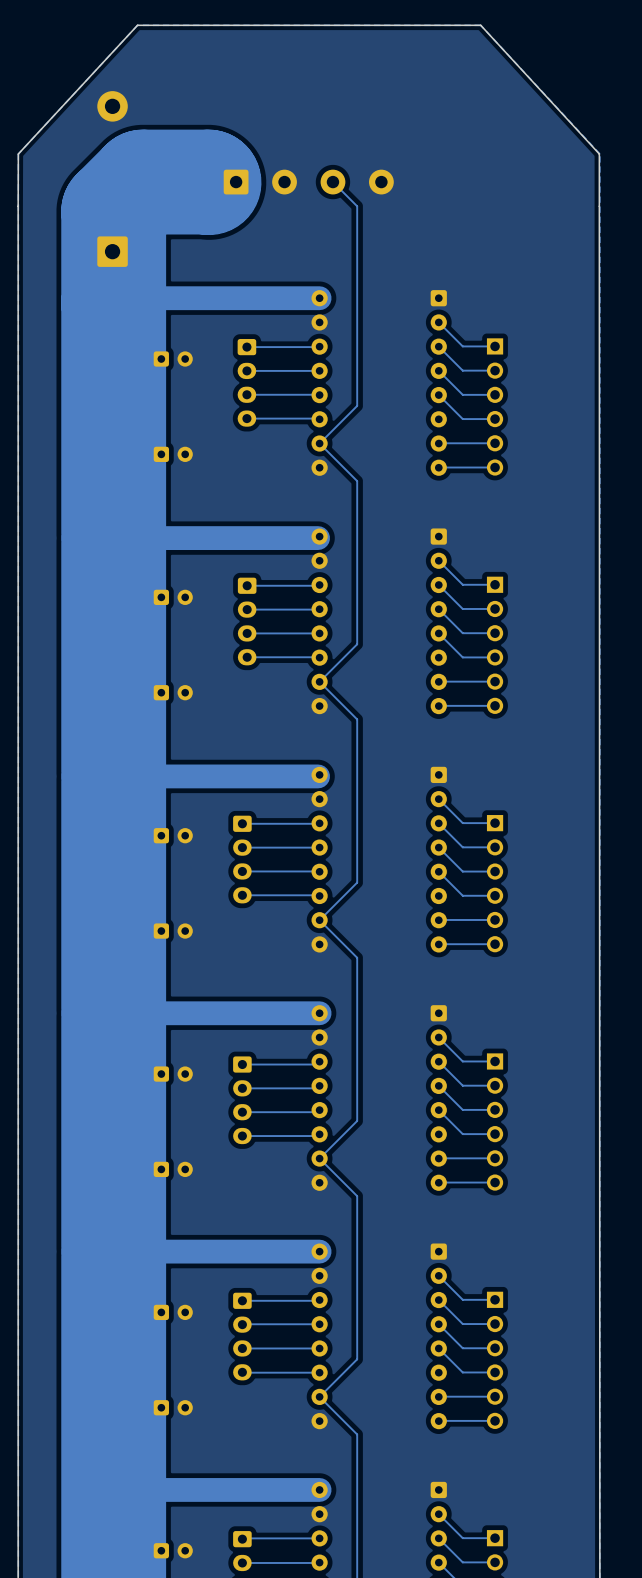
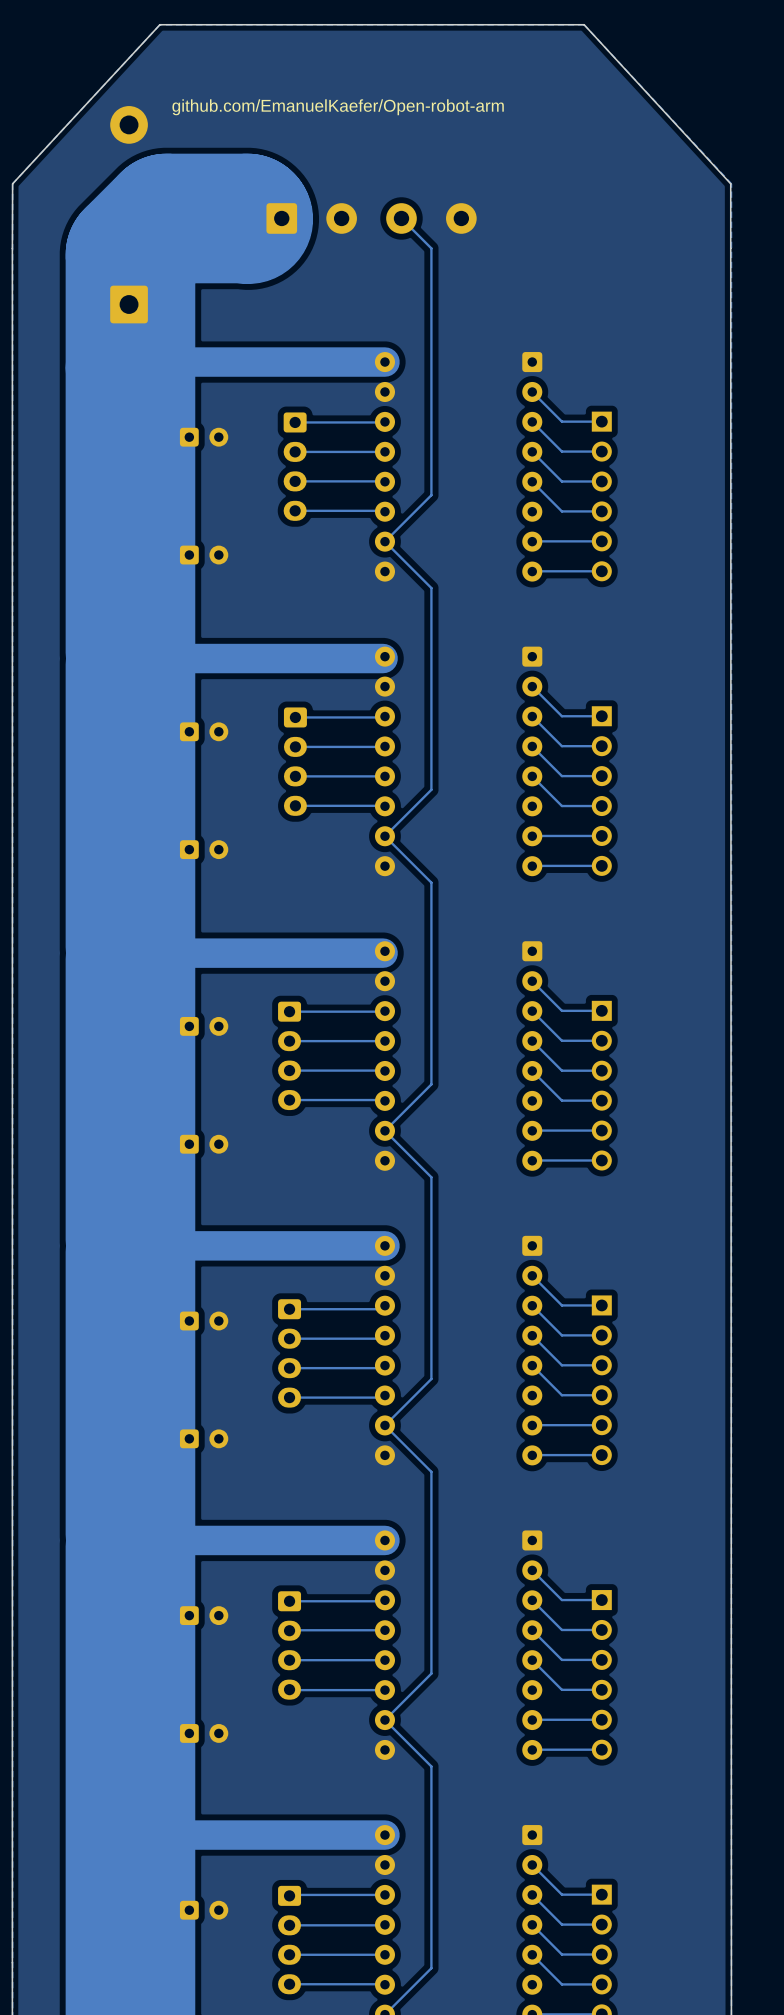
text: none -> github.com/EmanuelKaefer/Open-robot-arm (338, 107)

